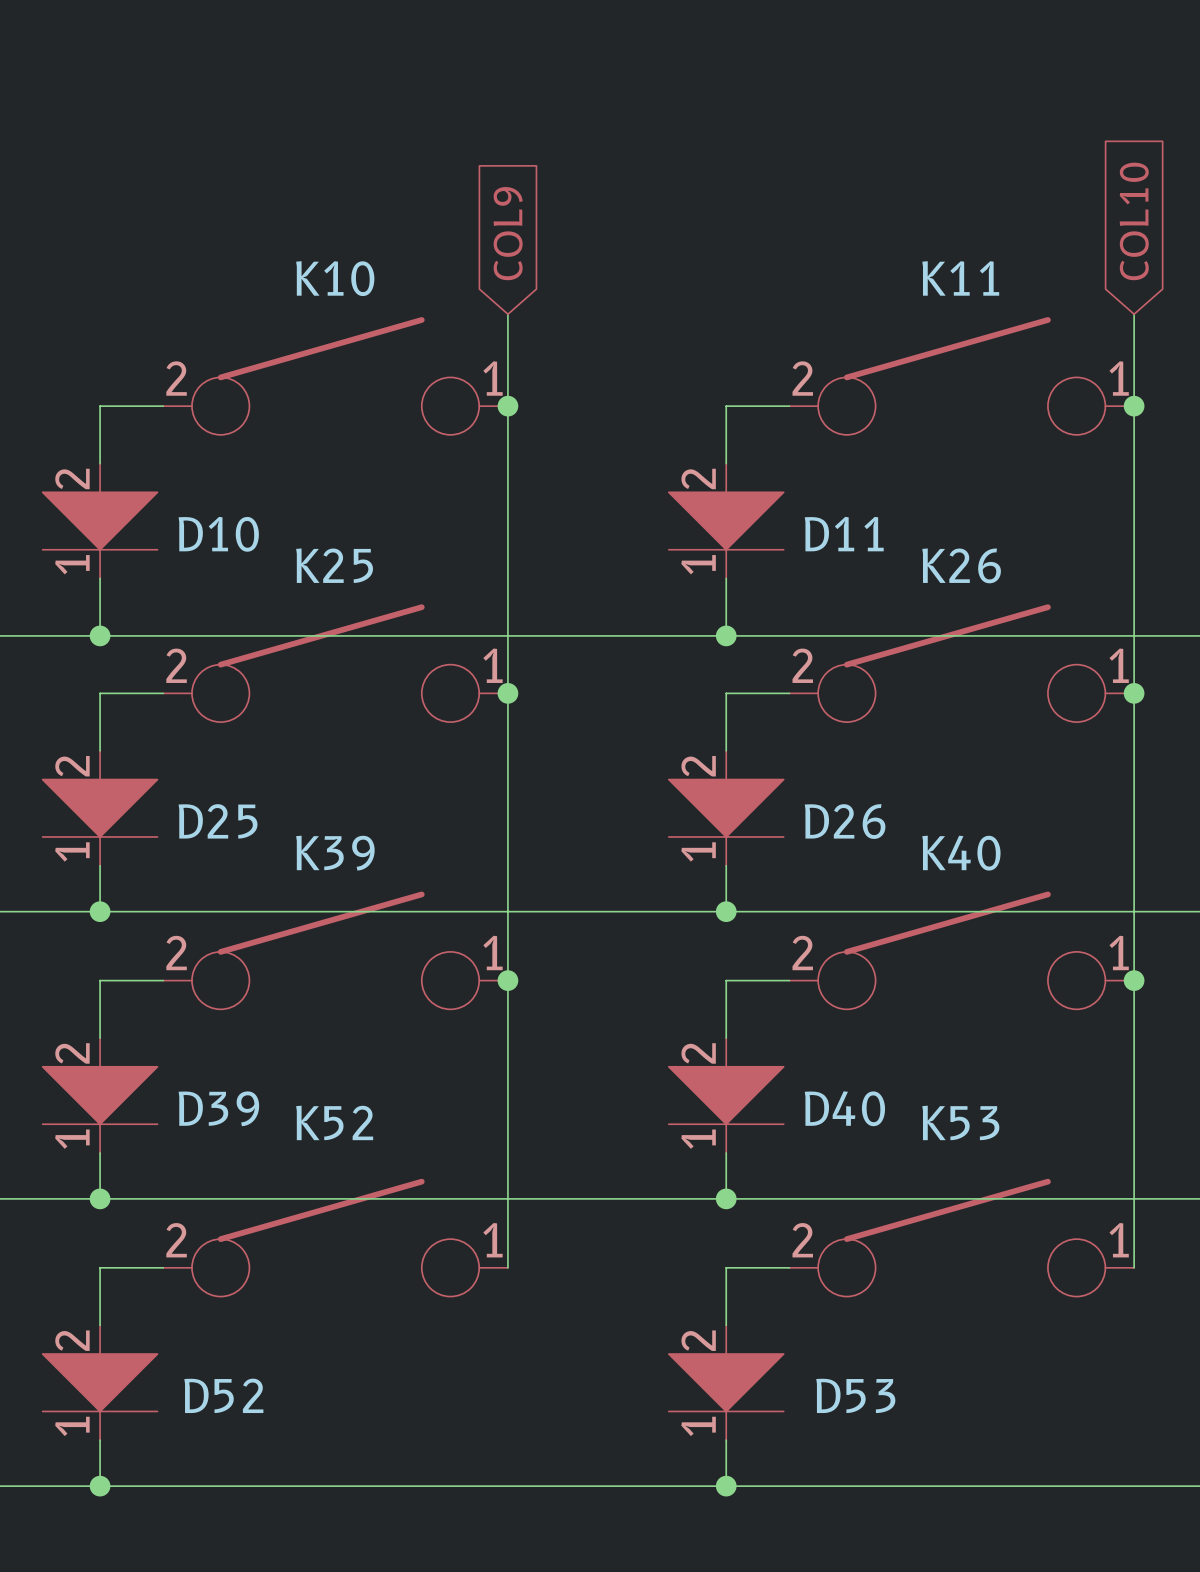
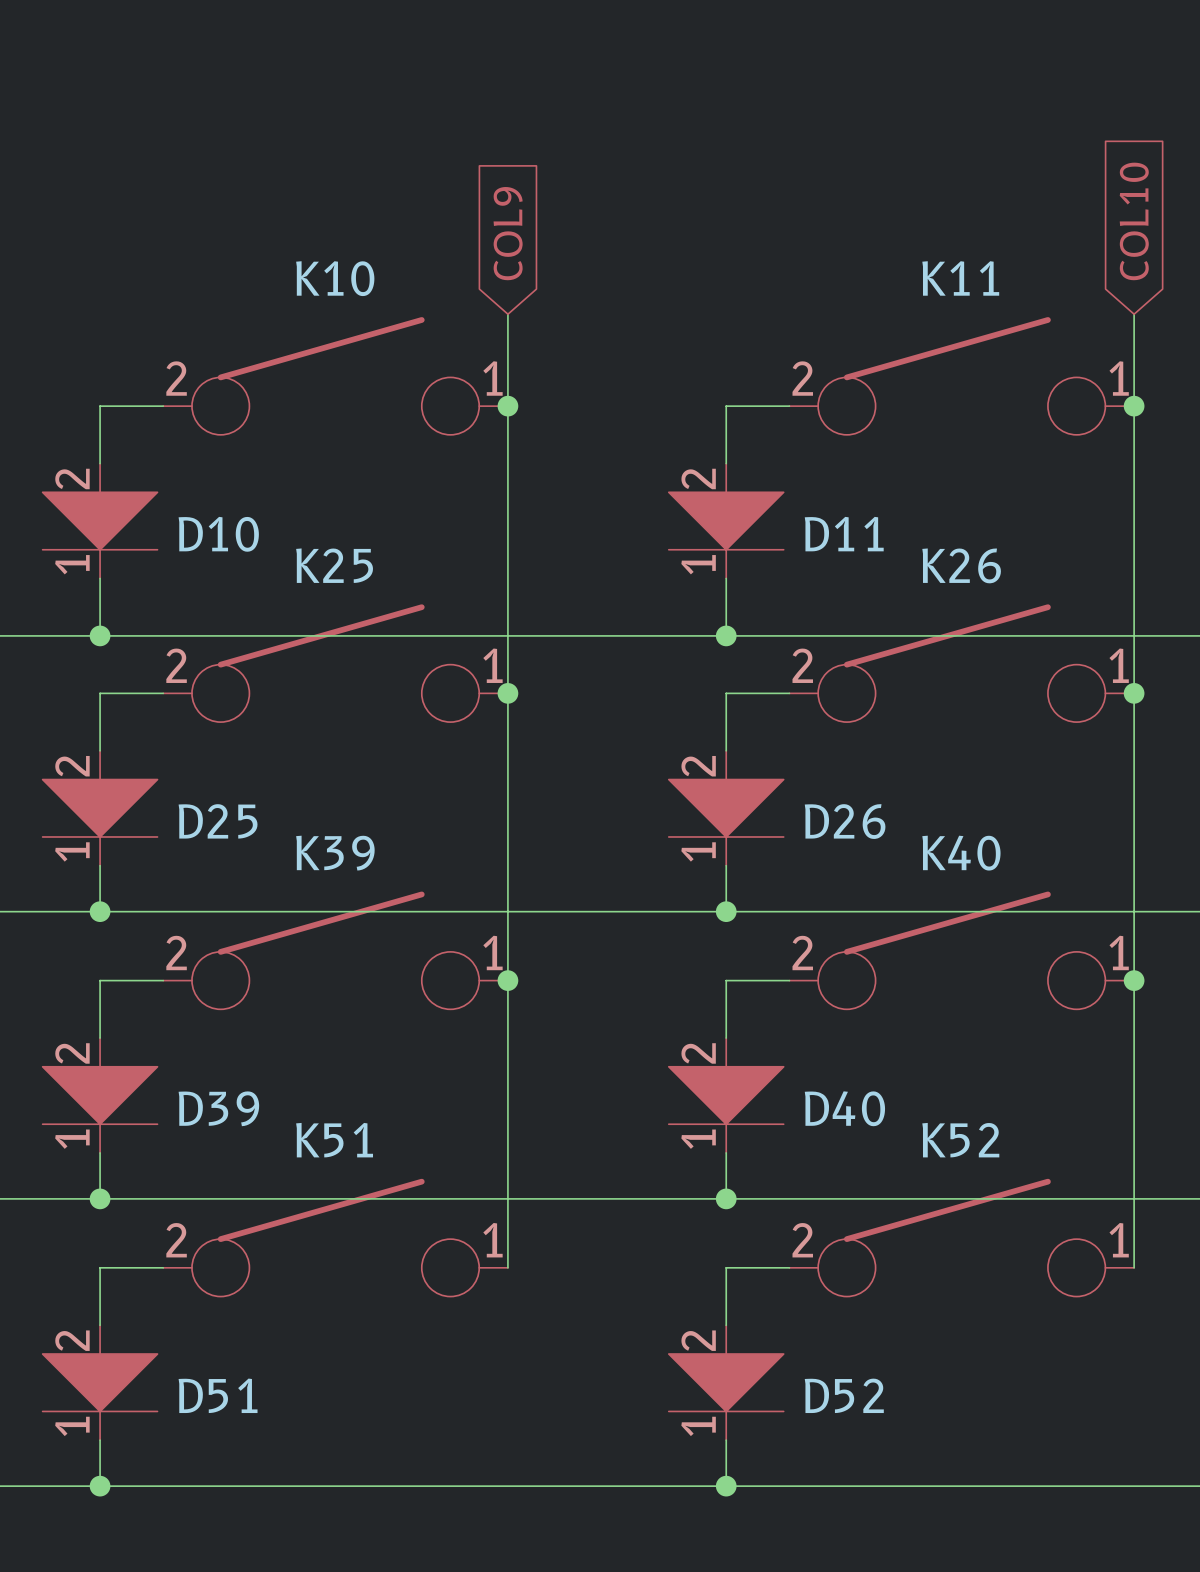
K52 name: K52 (334, 1122) -> K51 (334, 1140)
K53 name: K53 (960, 1122) -> K52 (960, 1140)
D52 name: D52 (223, 1395) -> D51 (218, 1395)
D53 name: D53 (855, 1395) -> D52 (844, 1395)

